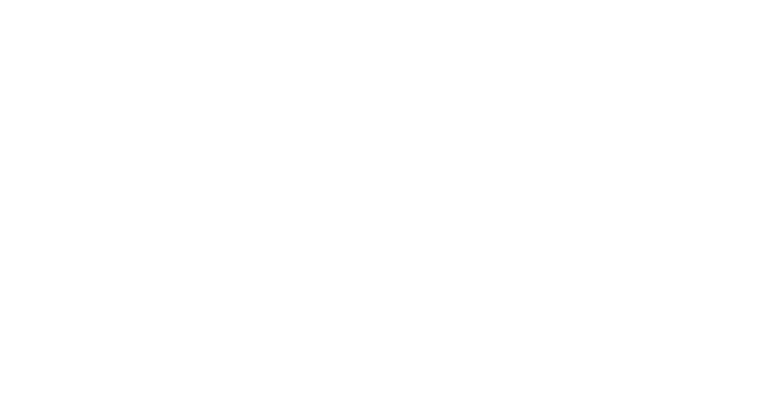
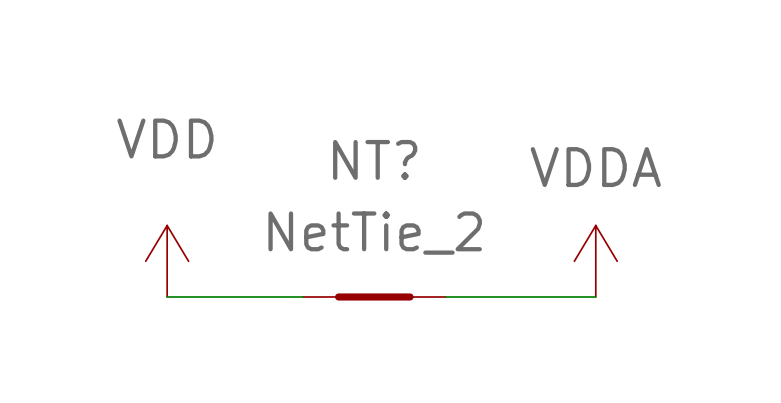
power symbol: none -> VDD (167, 261)
power symbol: none -> VDDA (595, 261)
wire: none -> (167, 296) (302, 296)
NT?: none -> NetTie_2 (374, 296)
wire: none -> (445, 296) (595, 296)

